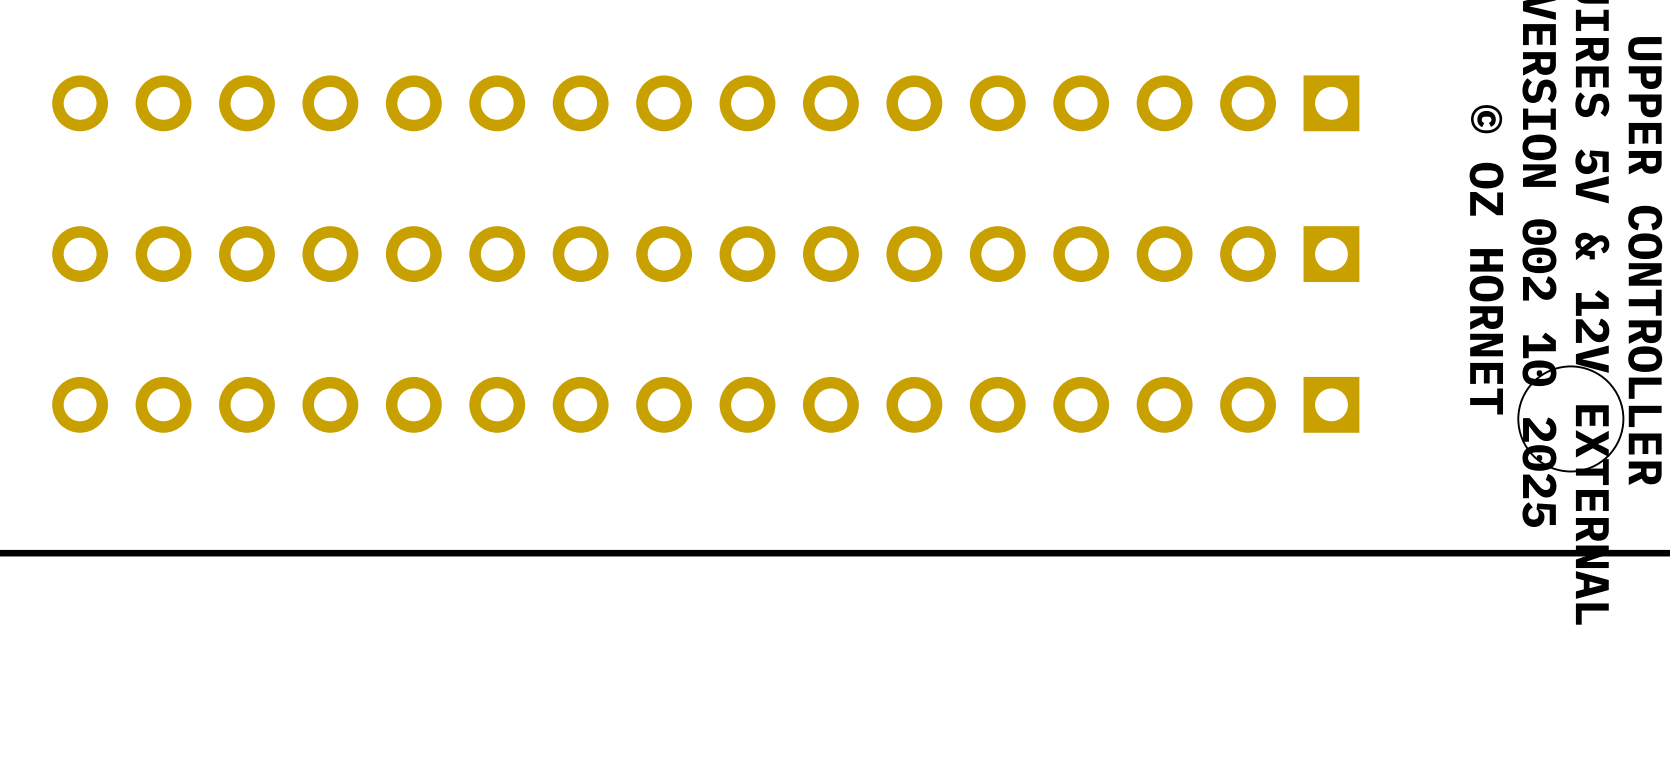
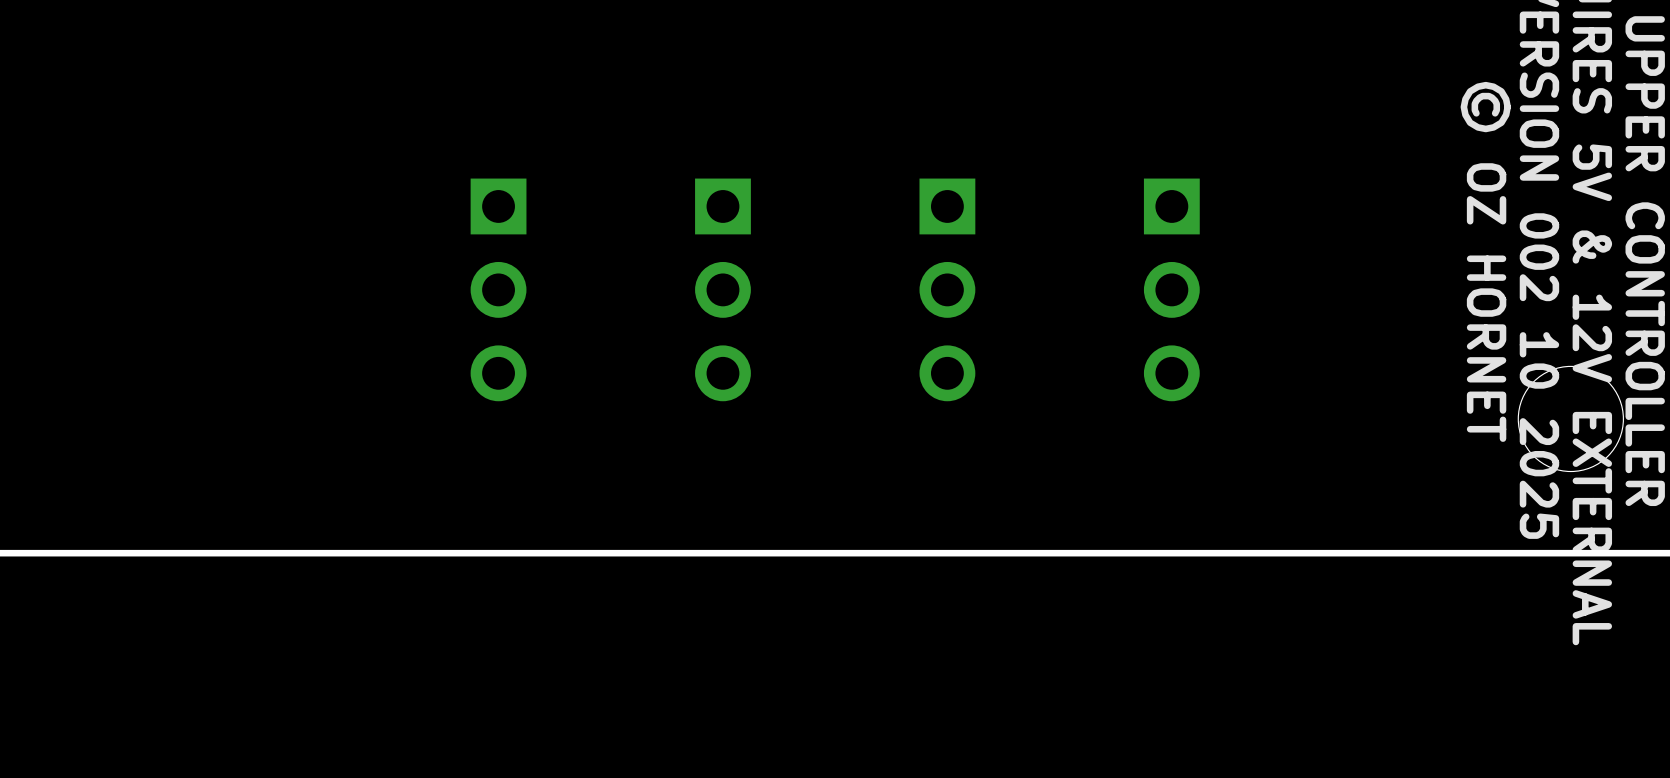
part: (705, 103) -> none
part: (705, 254) -> none
part: none -> (498, 289)
part: none -> (722, 289)
part: none -> (947, 289)
part: none -> (1171, 289)
part: (705, 404) -> none

